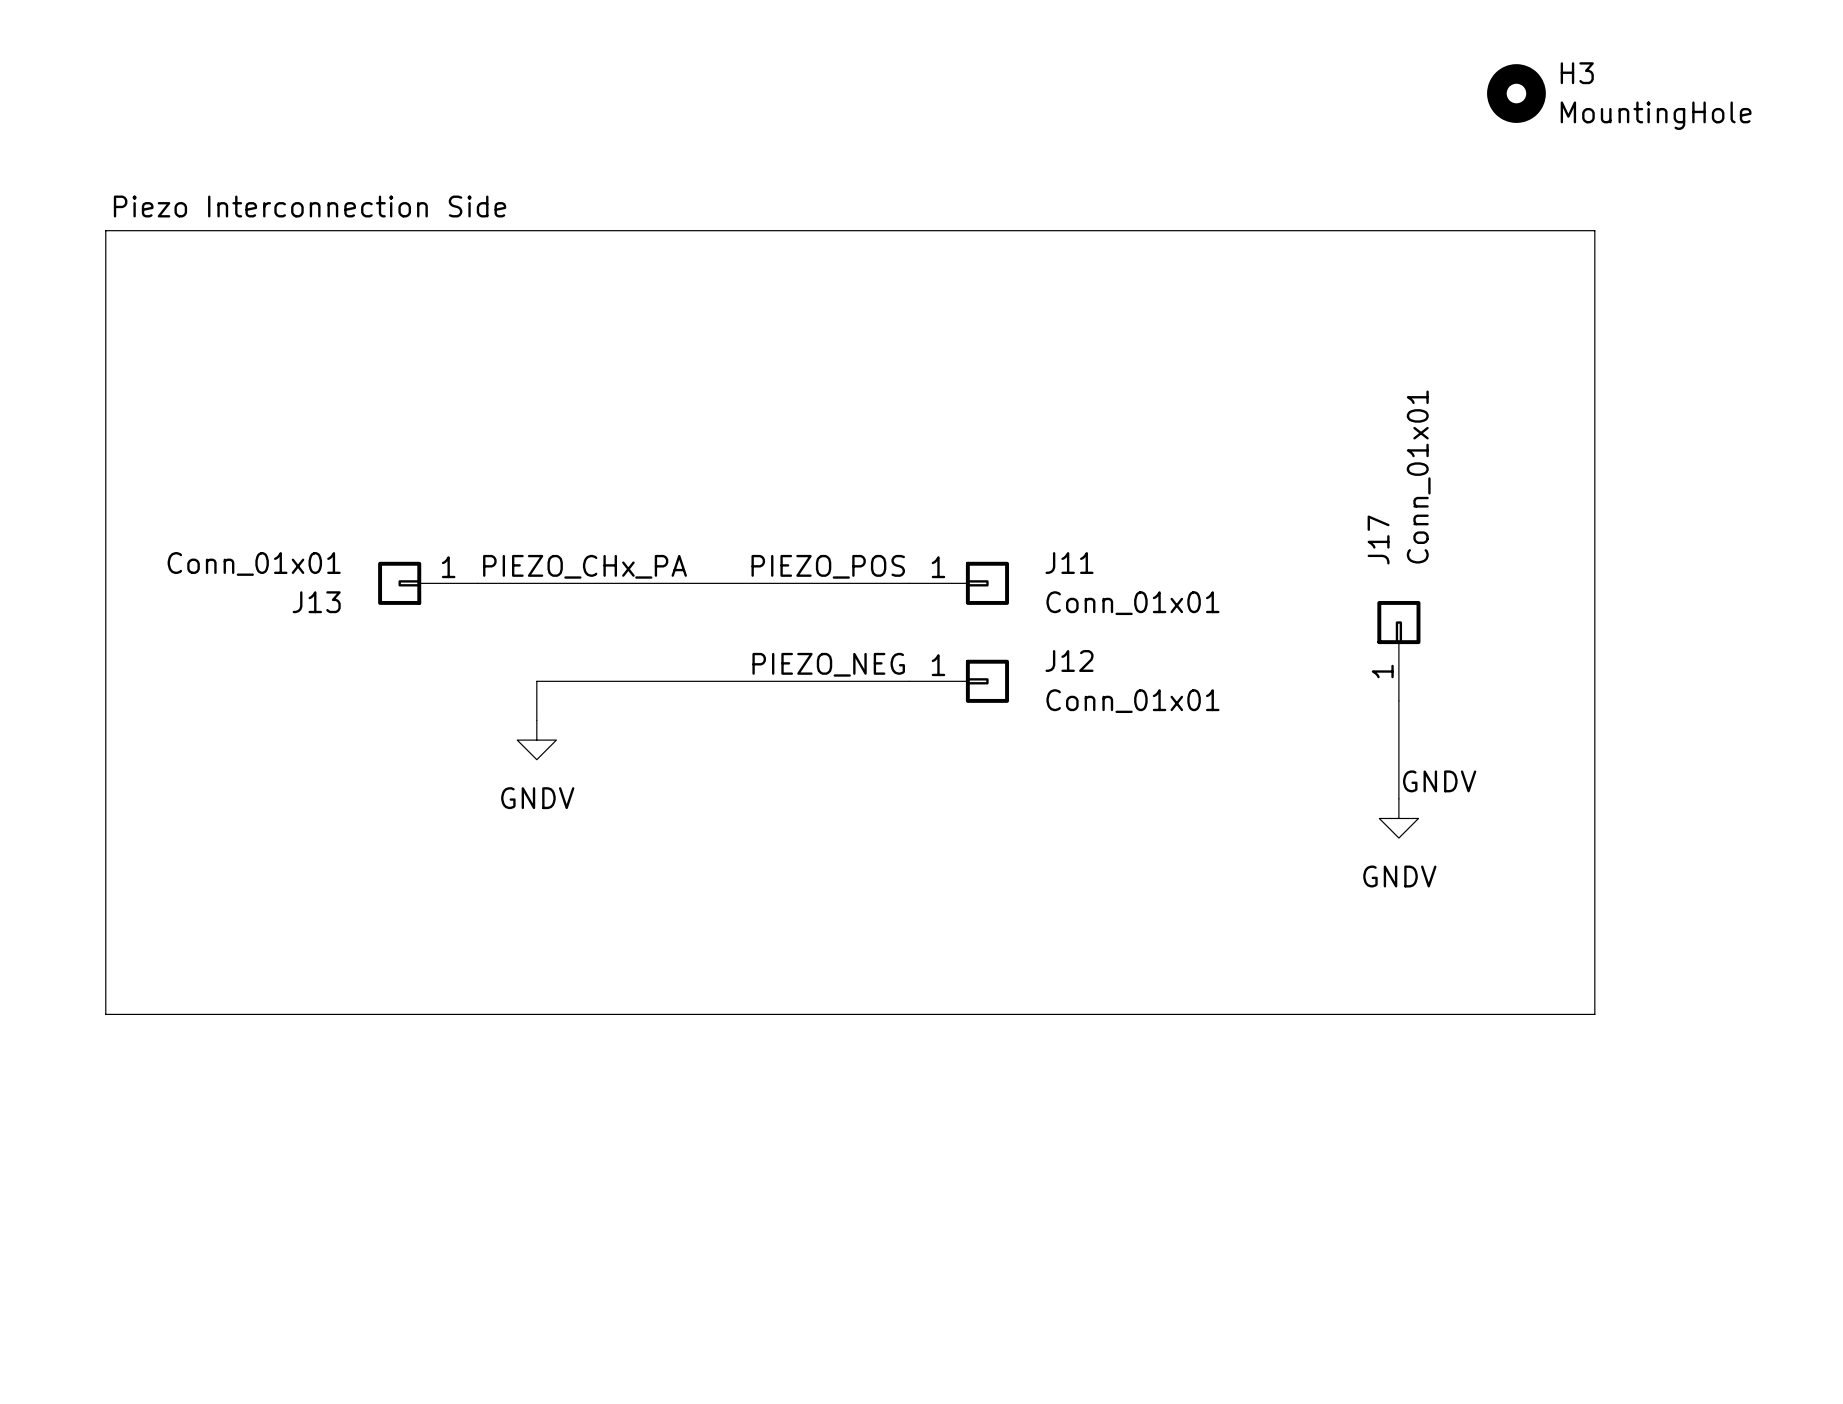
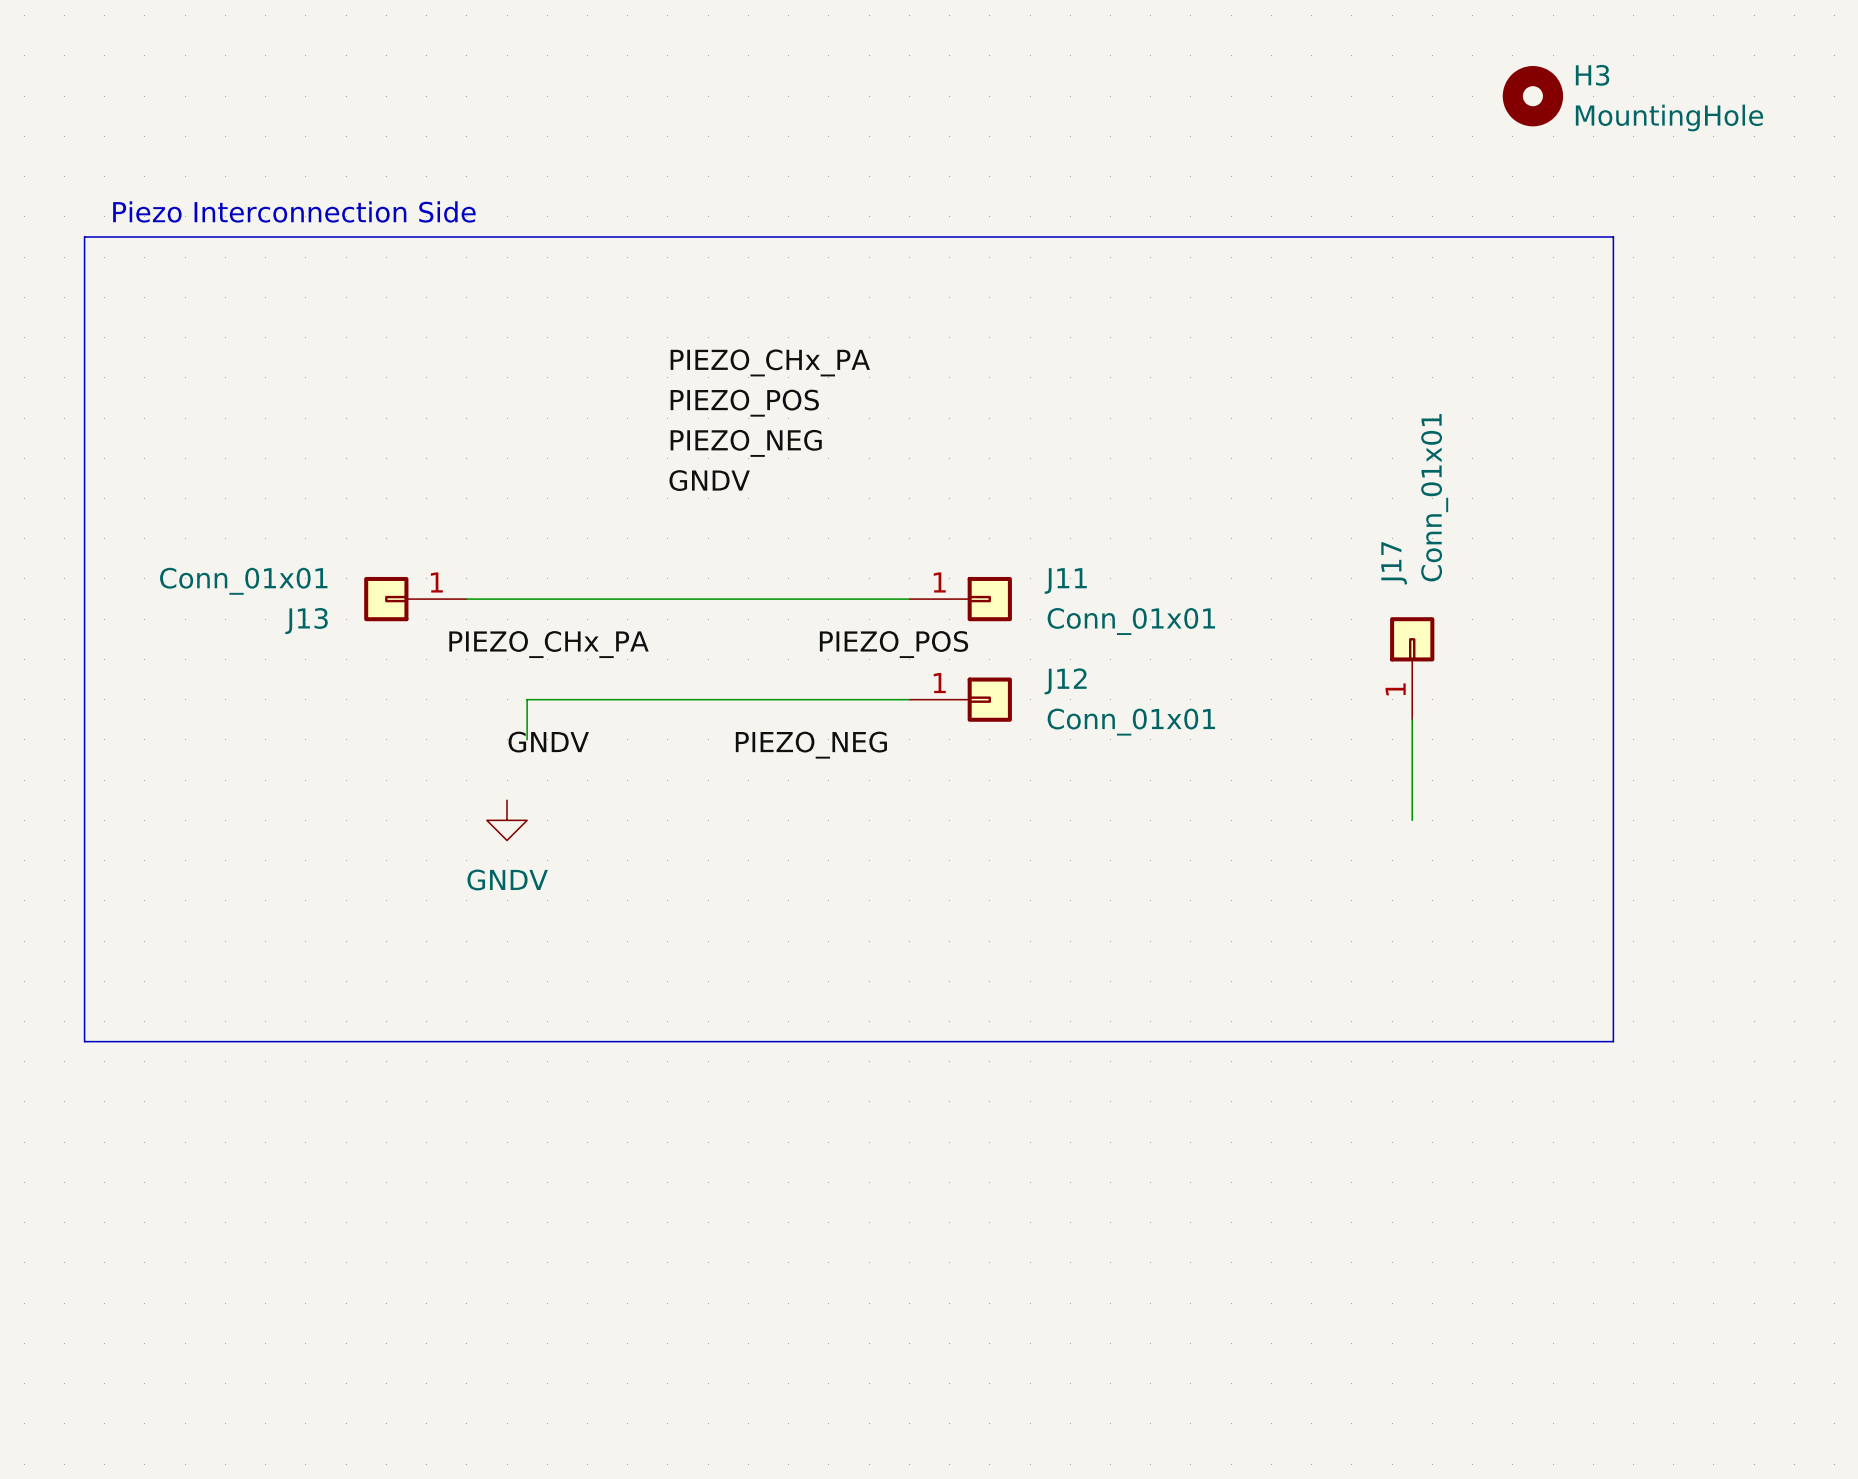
label: none -> PIEZO_CHx_PA (770, 362)
label: none -> PIEZO_POS (744, 403)
label: none -> PIEZO_NEG (746, 443)
label: none -> GNDV (709, 480)
label position: PIEZO_CHx_PA (585, 566) -> PIEZO_CHx_PA (549, 644)
label position: PIEZO_POS (828, 566) -> PIEZO_POS (894, 644)
label position: PIEZO_NEG (828, 664) -> PIEZO_NEG (811, 745)
label: none -> GNDV (548, 742)
power symbol position: GNDV (536, 740) -> GNDV (507, 820)
label: GNDV (1439, 781) -> none
power symbol: GNDV (1398, 818) -> none

